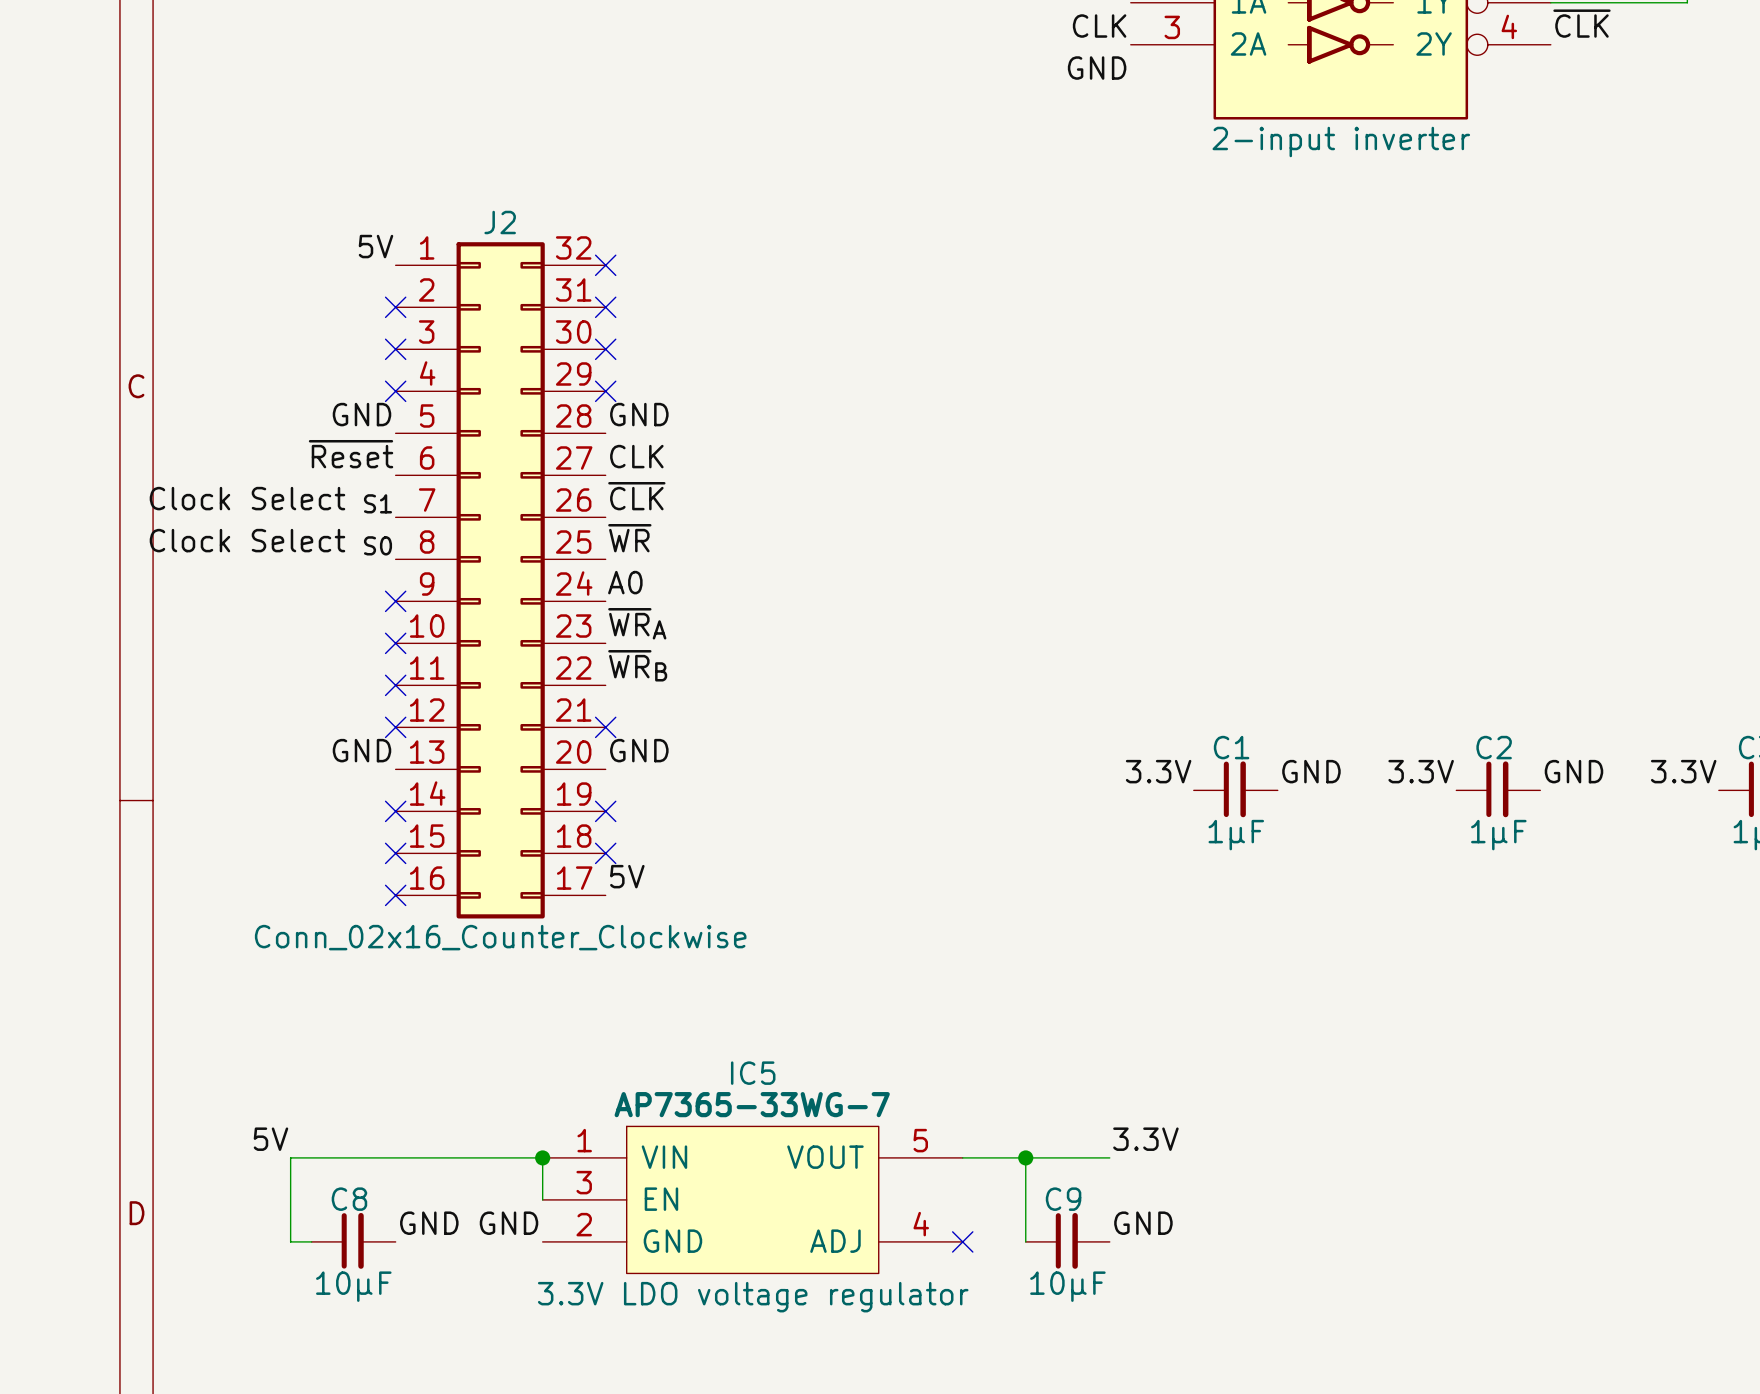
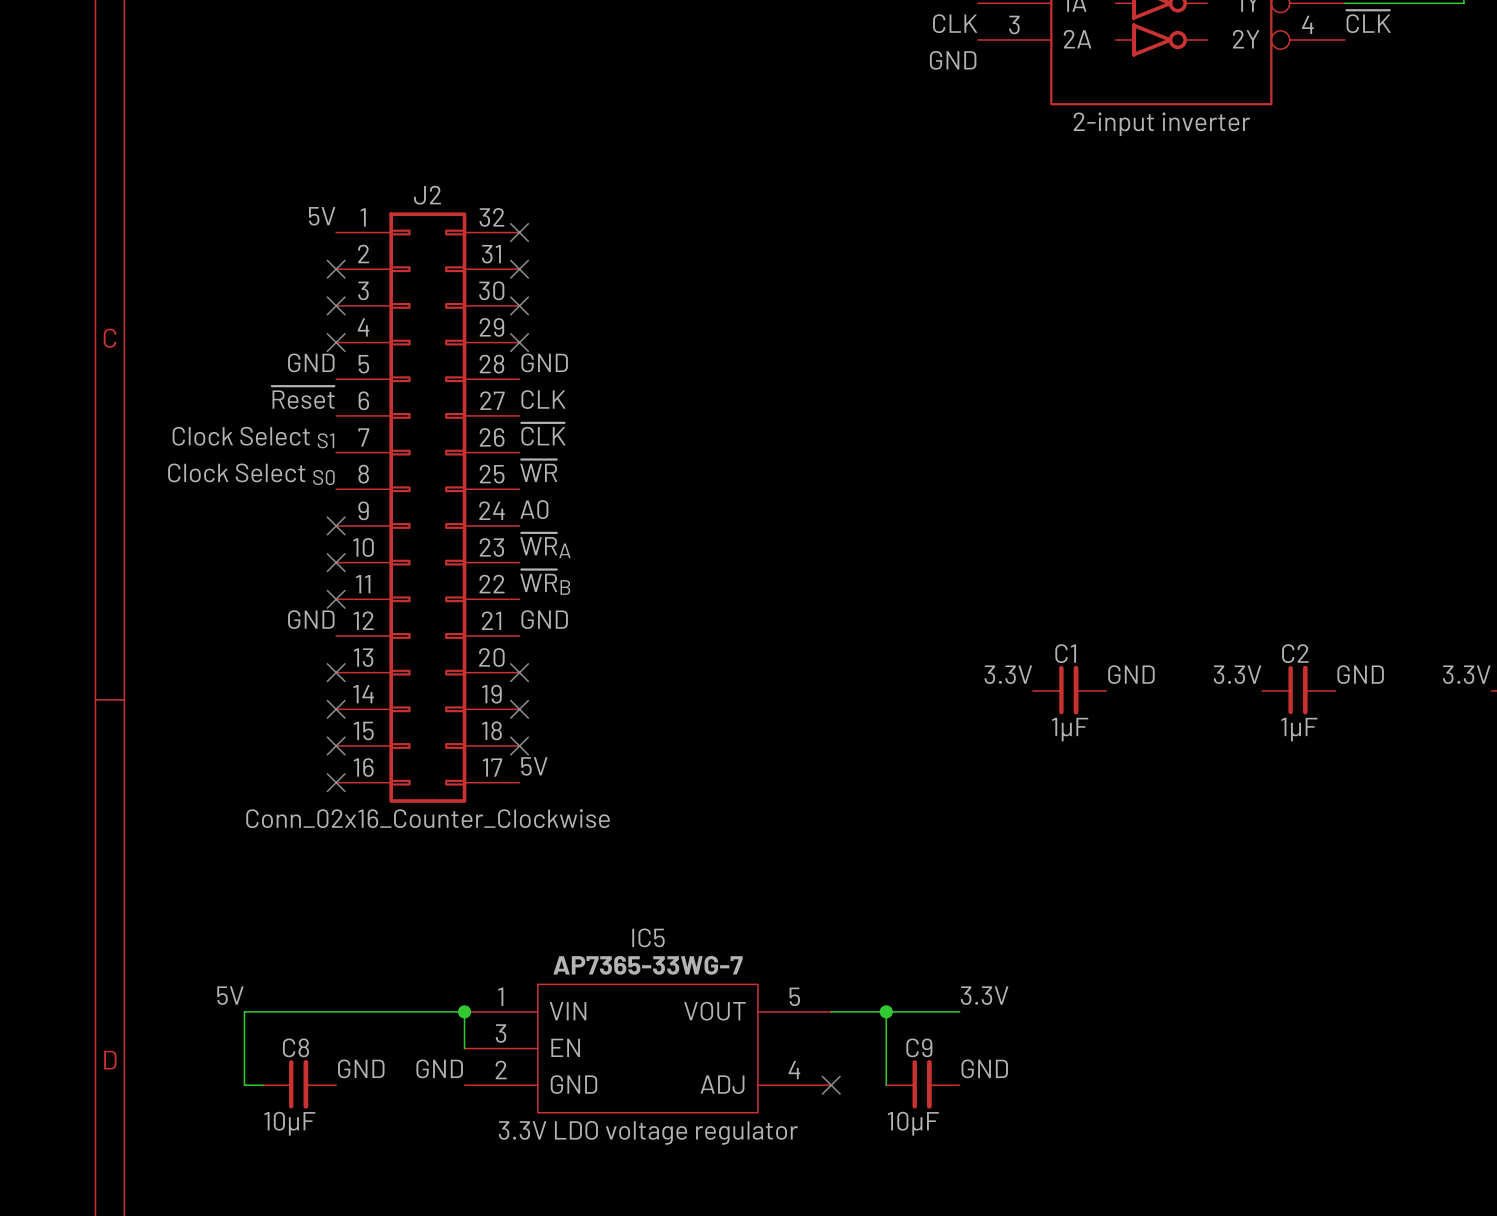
no-connect mark position: (395, 727) -> (336, 672)
no-connect mark position: (605, 727) -> (519, 672)
label position: GND (361, 750) -> GND (311, 619)
label position: GND (639, 750) -> GND (544, 619)

